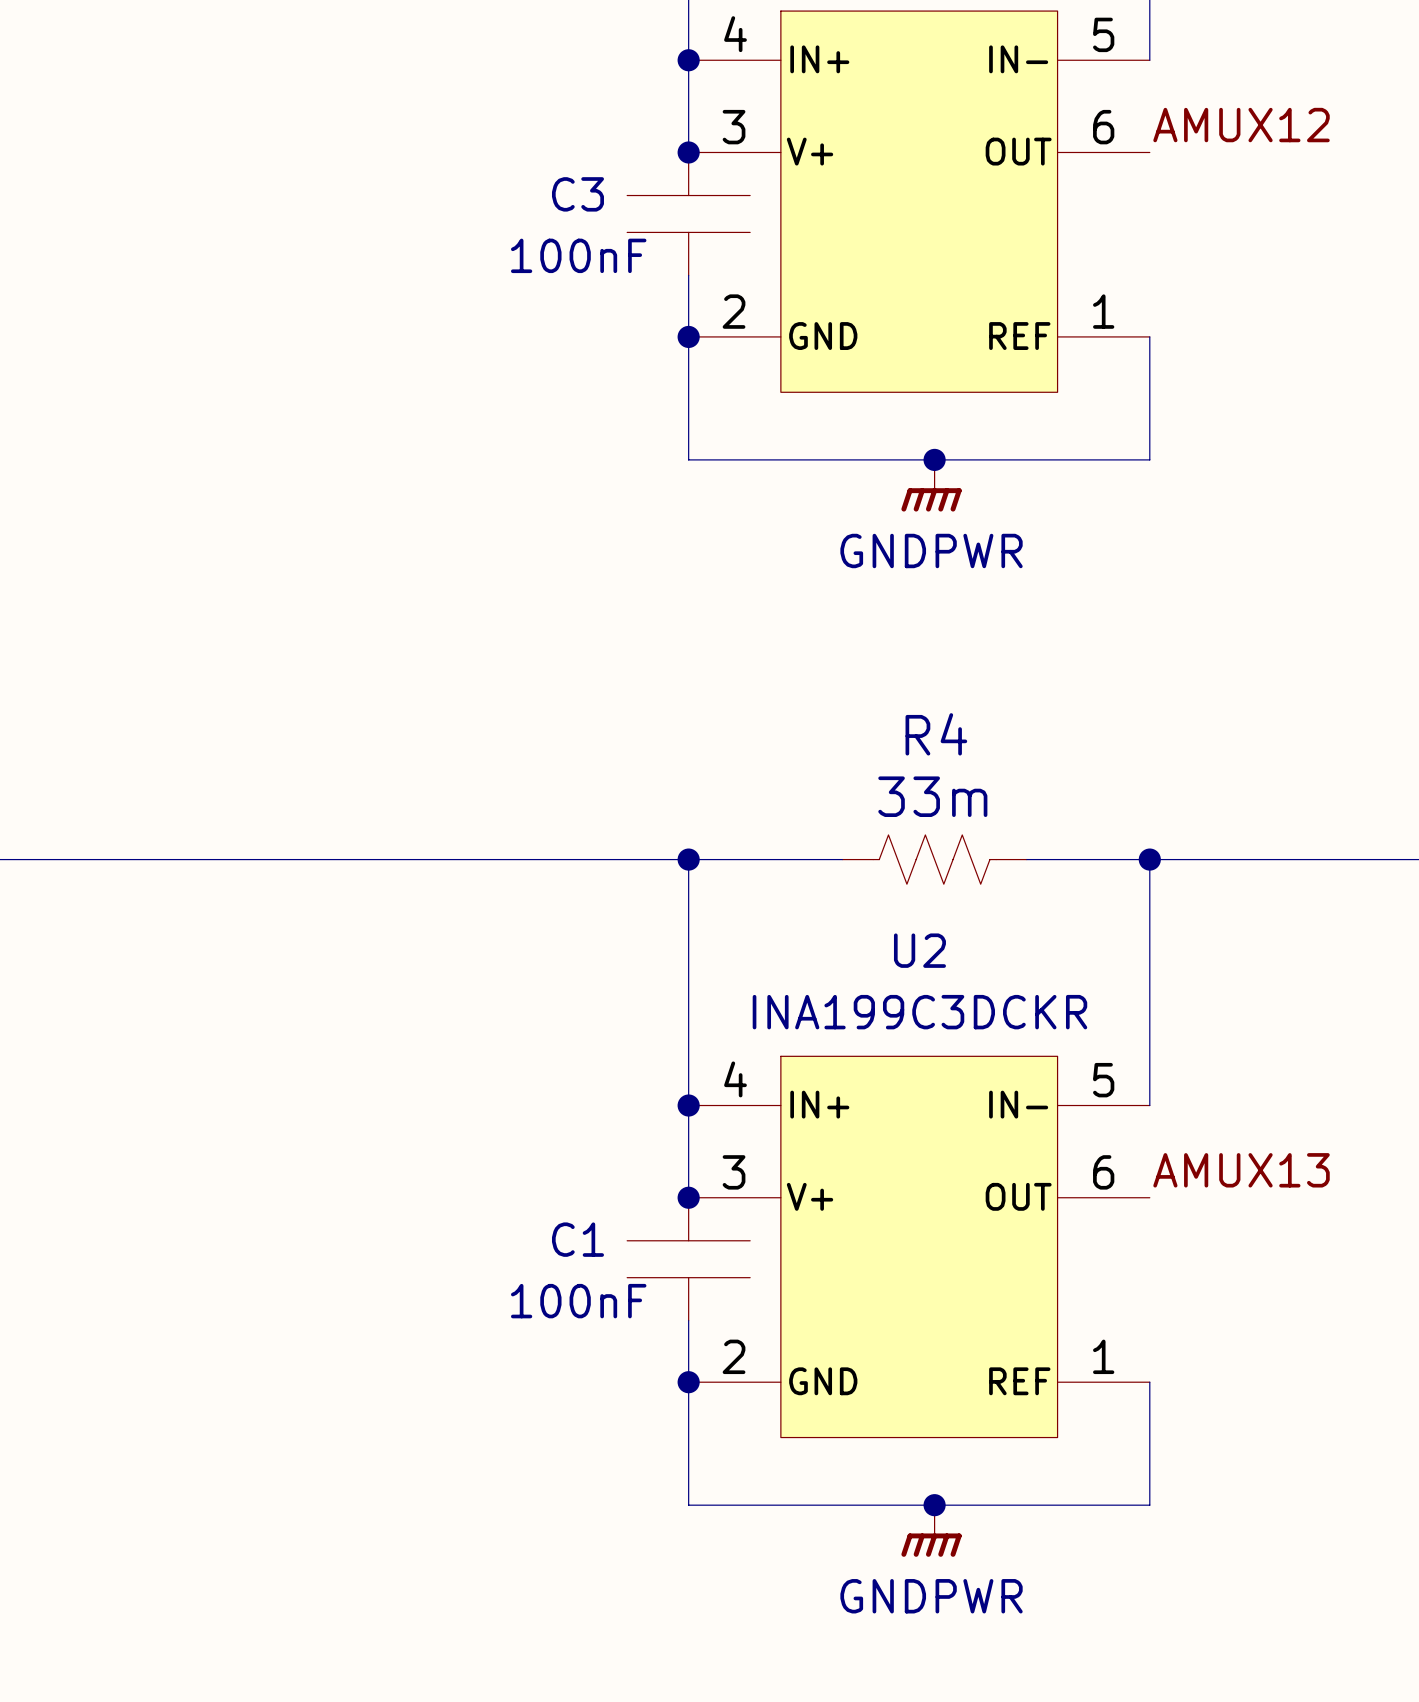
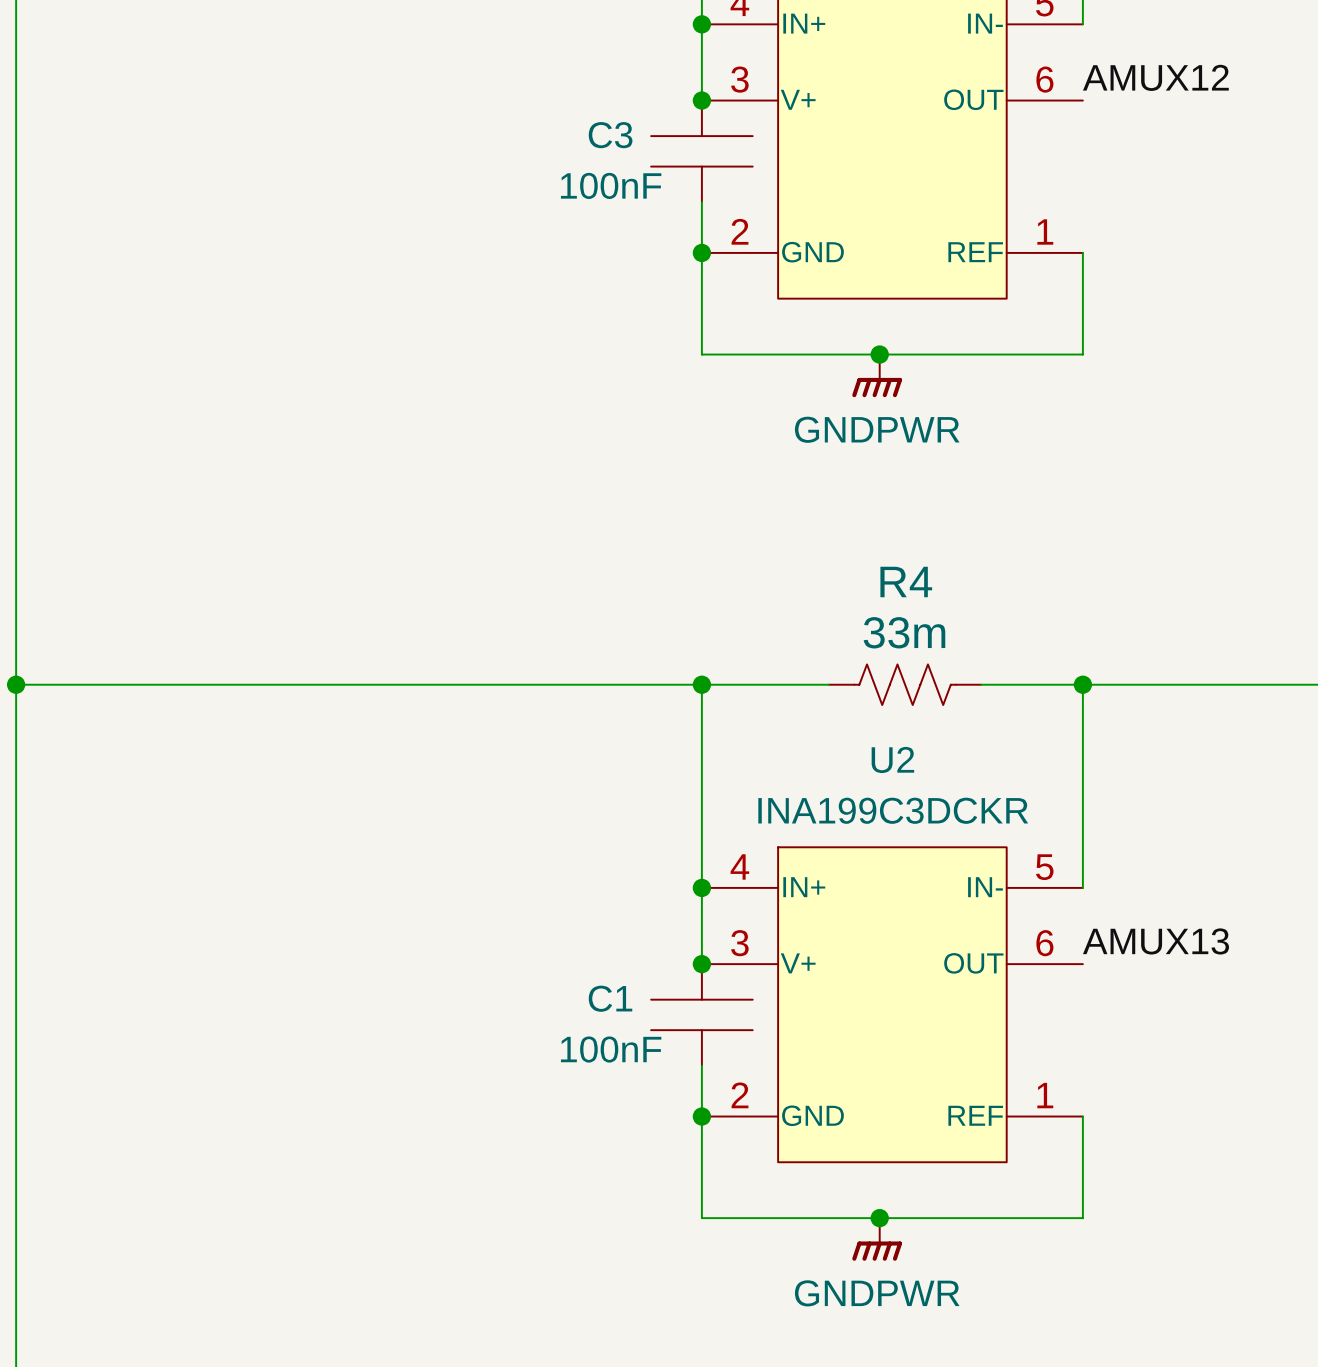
junction position: (934, 459) -> (879, 354)
power symbol position: GNDPWR (931, 485) -> GNDPWR (877, 375)
junction position: (934, 1505) -> (879, 1218)
power symbol position: GNDPWR (931, 1531) -> GNDPWR (877, 1239)

